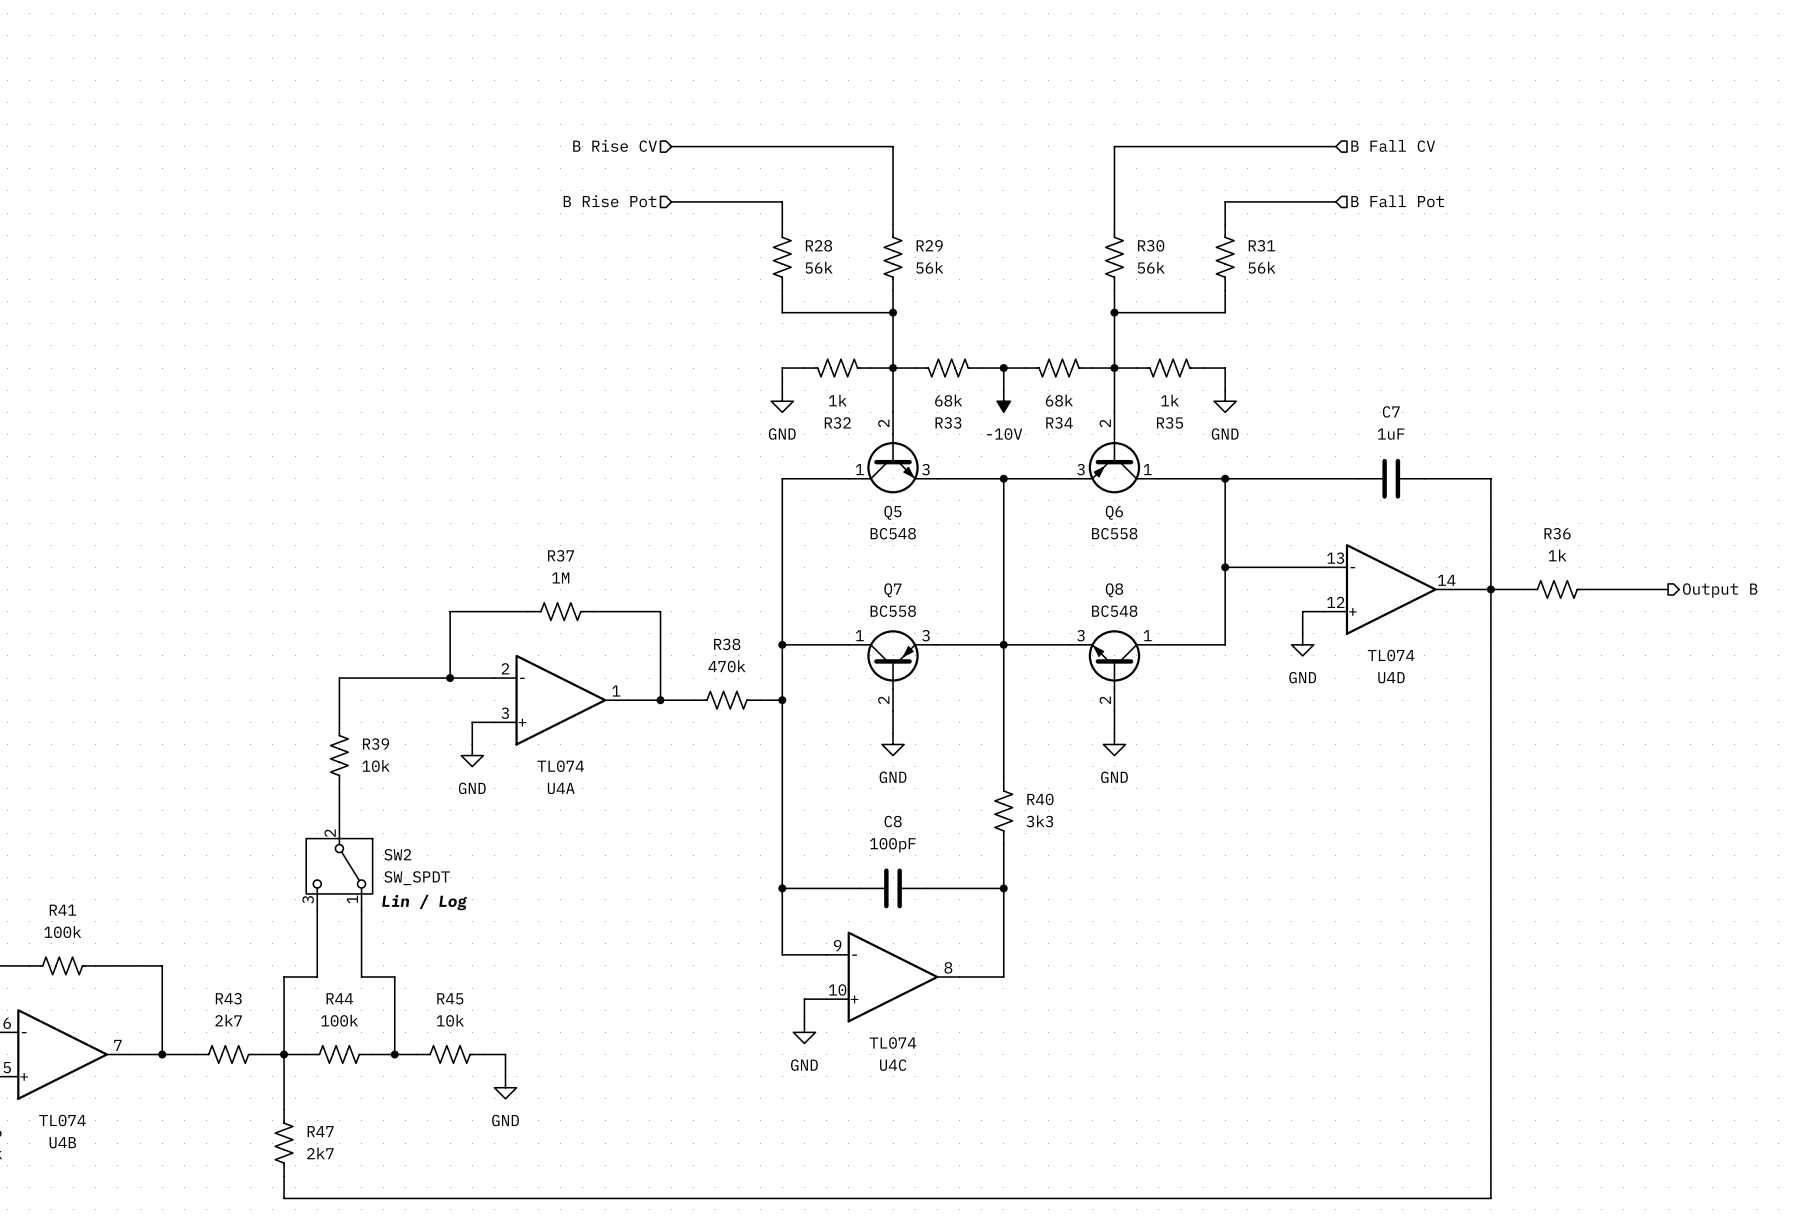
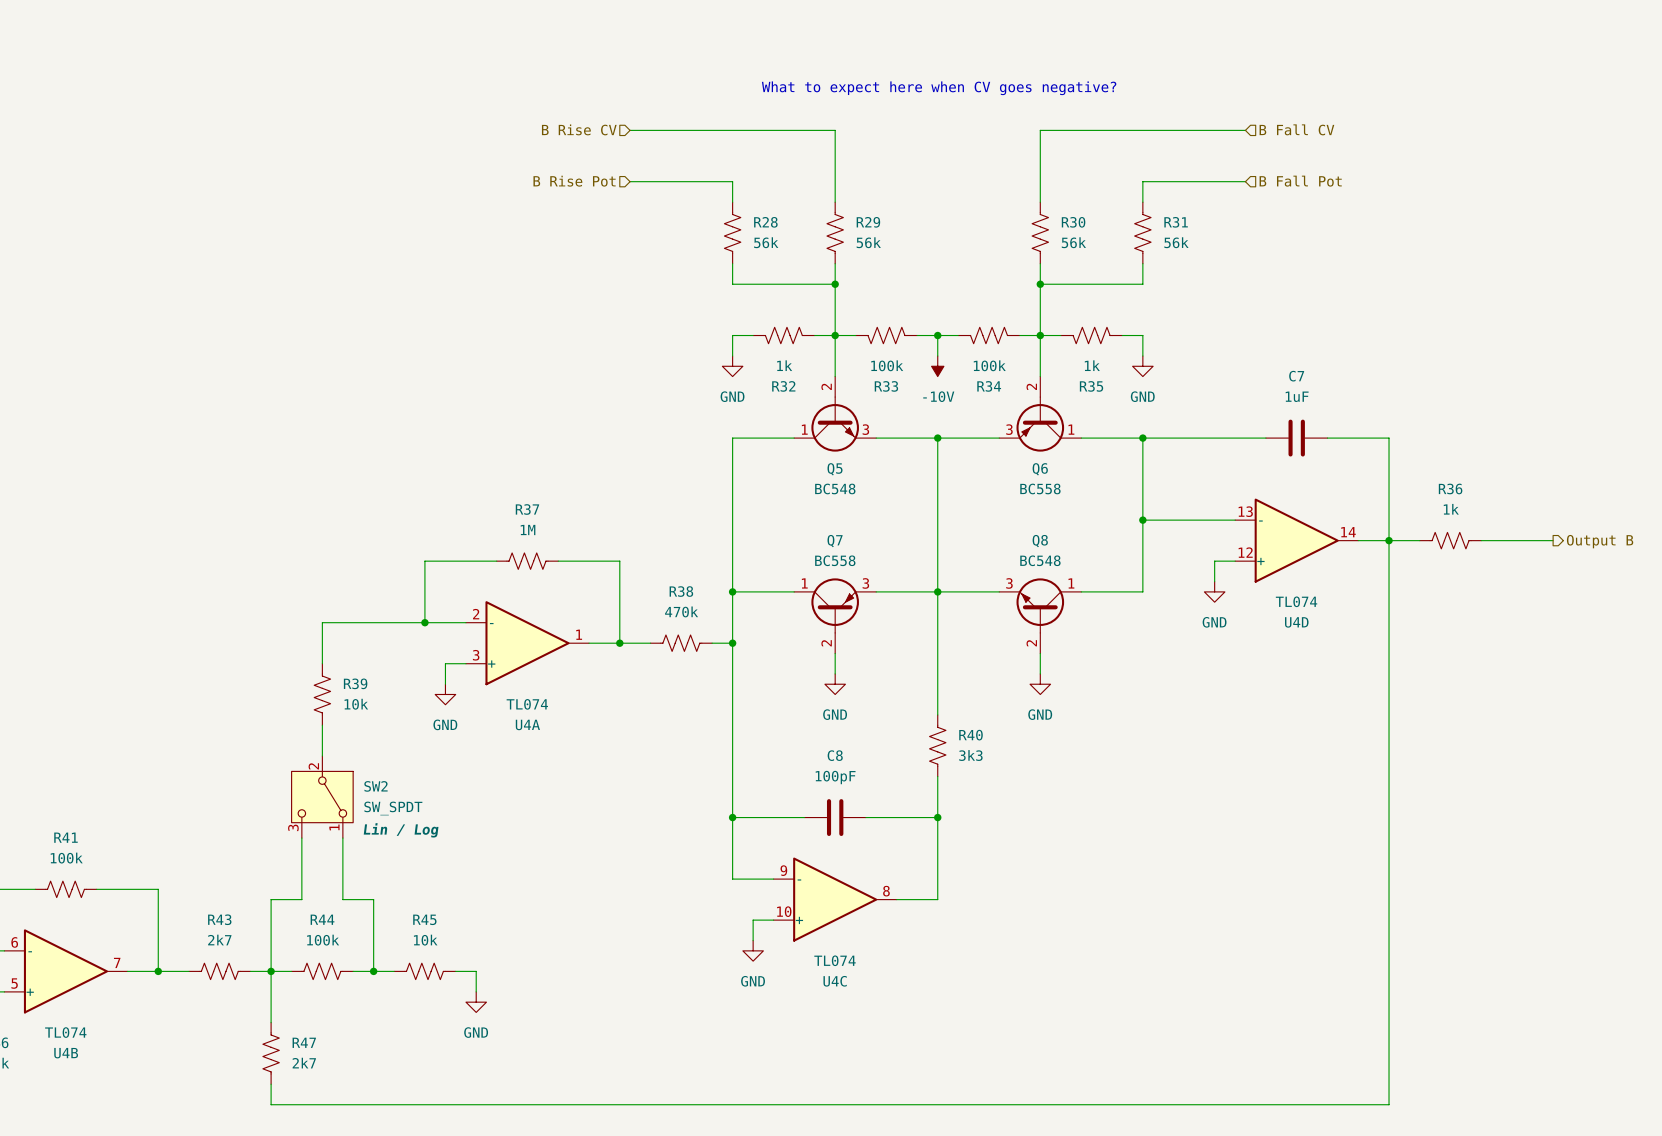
text: none -> What to expect here when CV goes negative? (939, 88)
R33 value: 68k (948, 400) -> 100k (887, 365)
R34 value: 68k (1059, 400) -> 100k (989, 365)

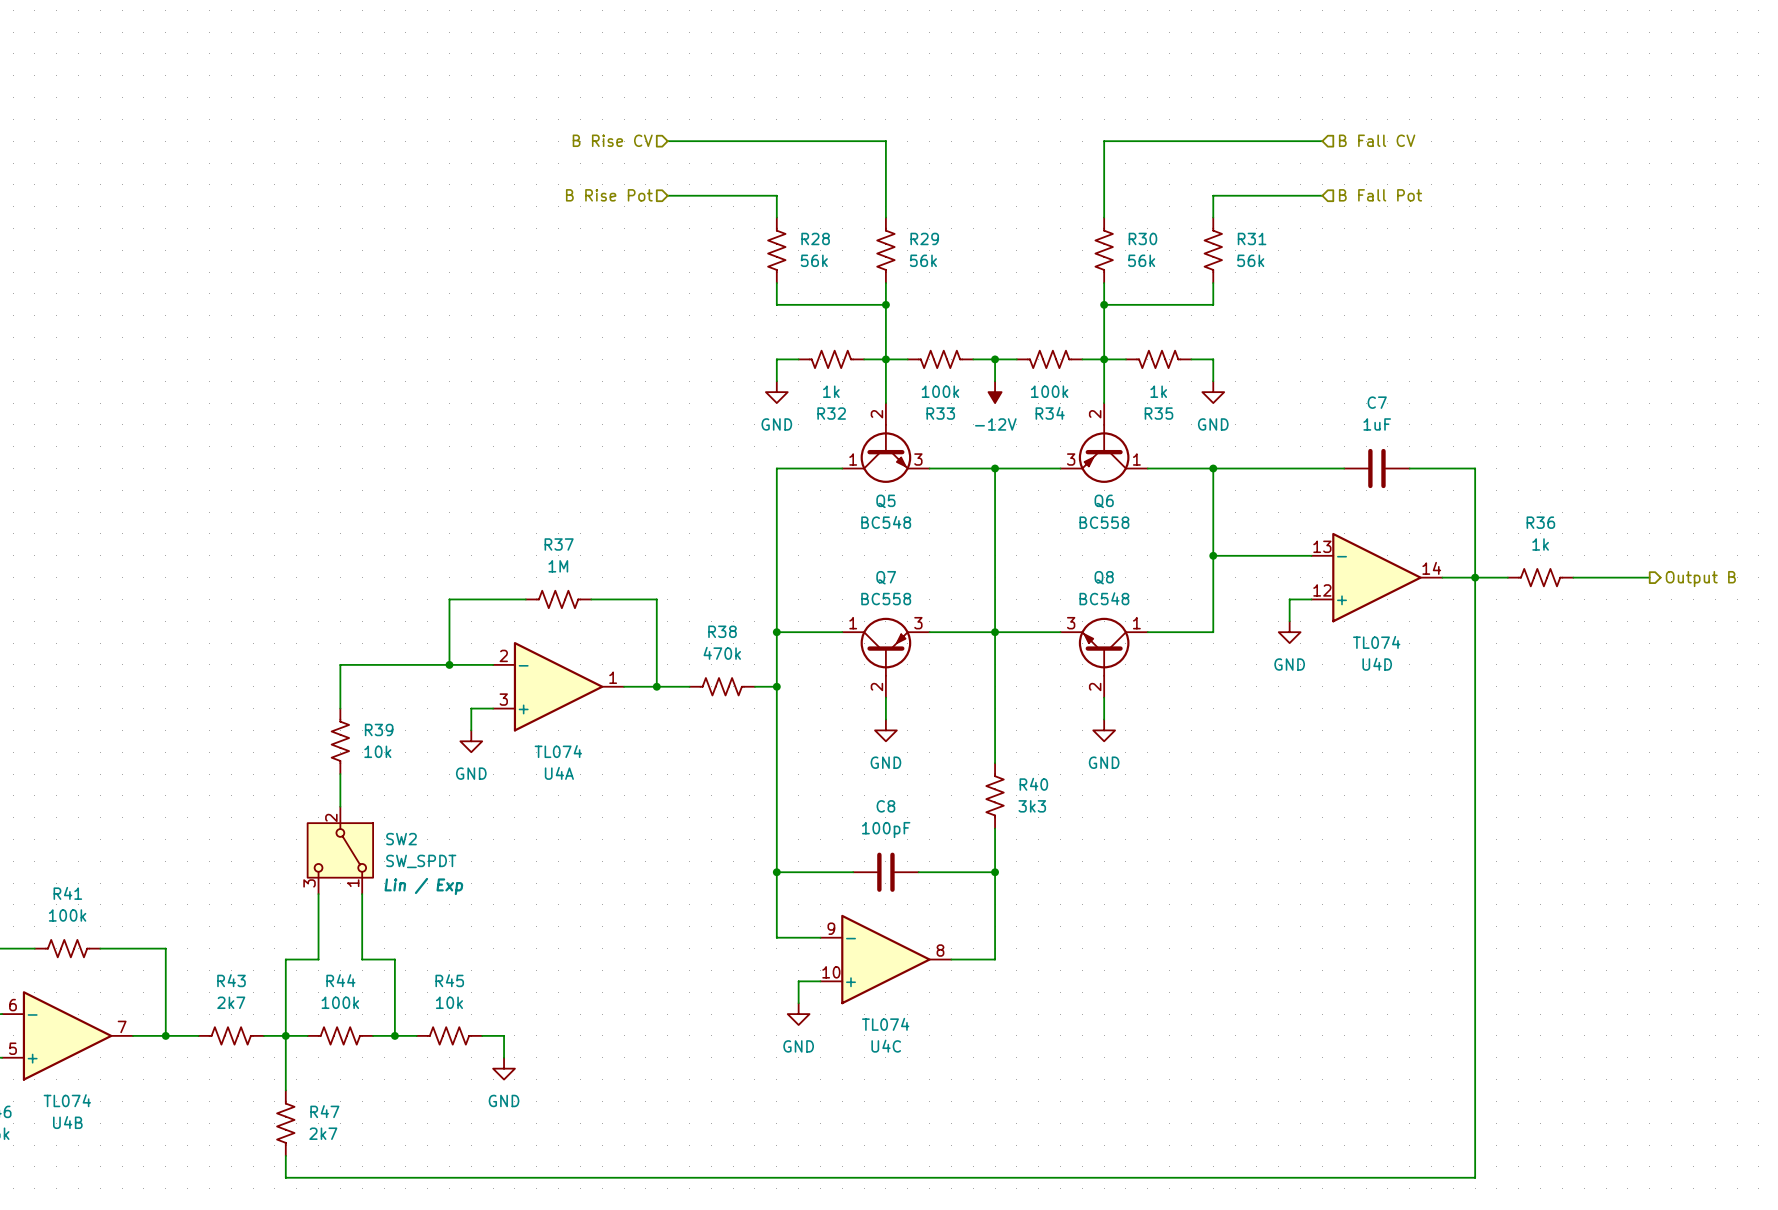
text: What to expect here when CV goes negative? (939, 88) -> none
power symbol: -10V (937, 366) -> -12V (995, 392)
SW2 text: Lin / Log (401, 830) -> Lin / Exp (423, 886)

